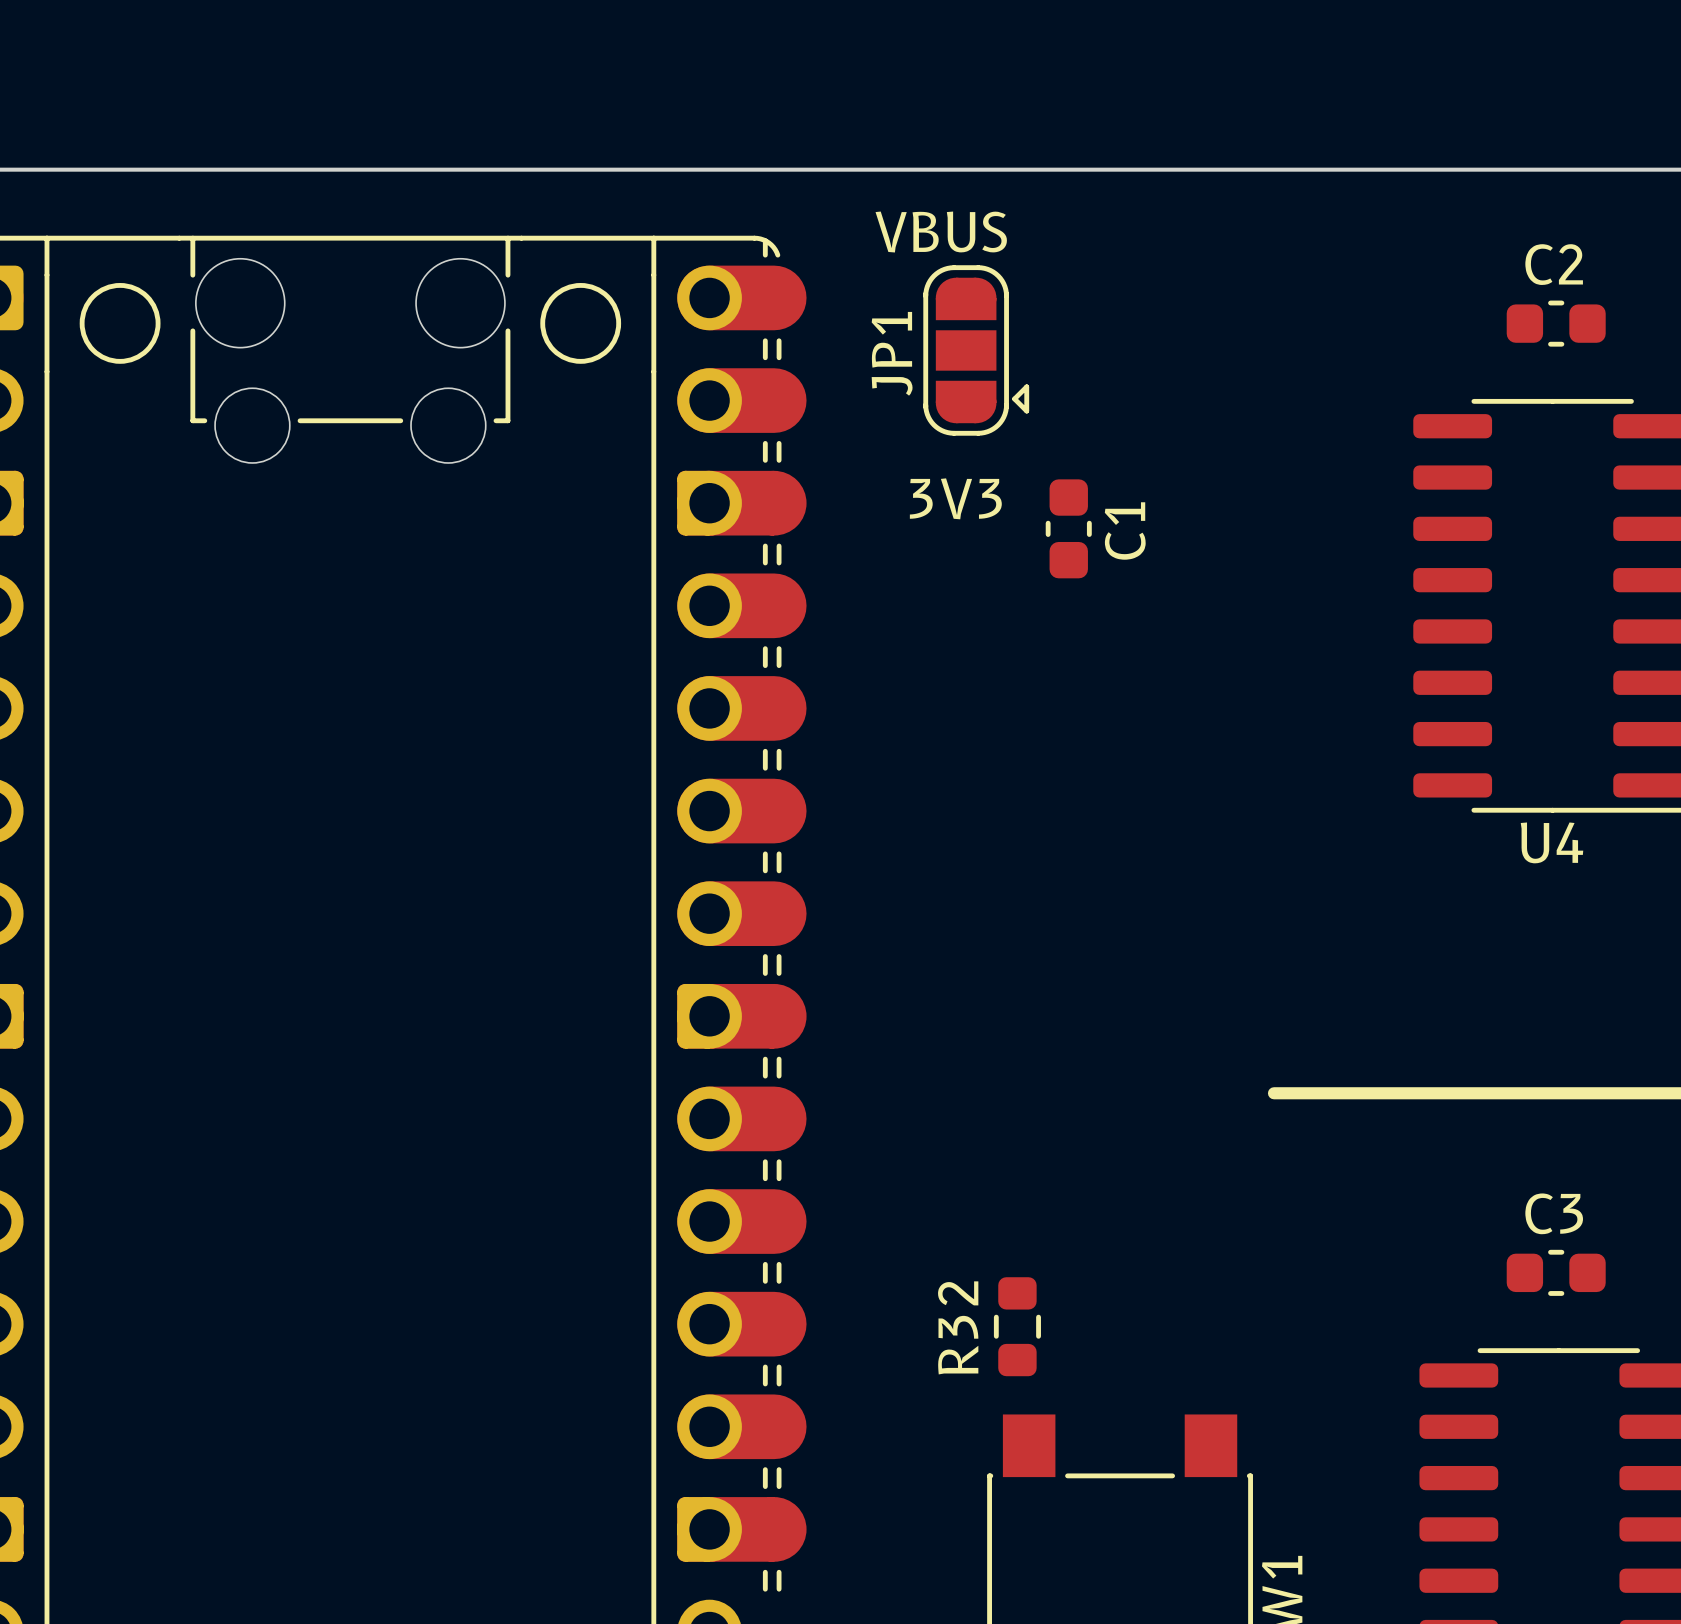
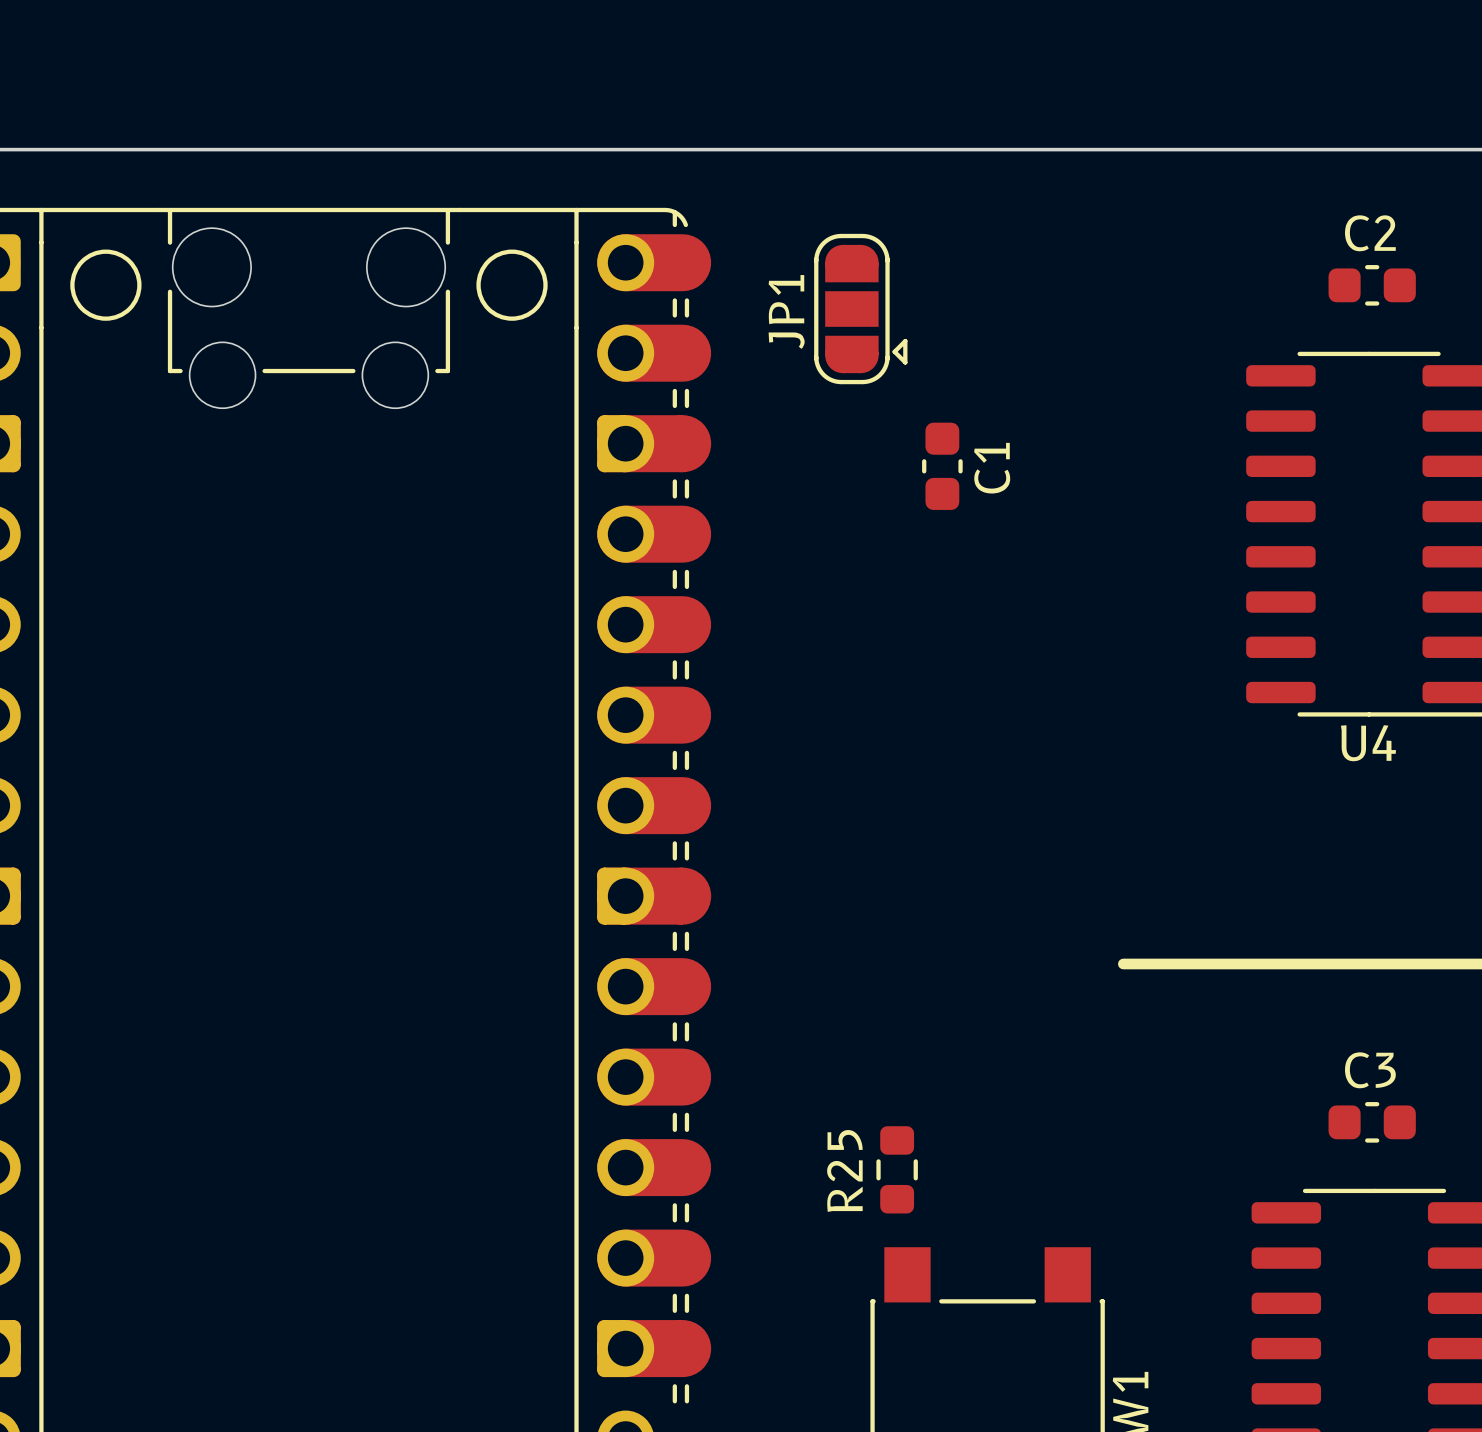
text: VBUS (941, 232) -> none
text: 3V3 (955, 498) -> none
R32 name: R32 (958, 1327) -> R25 (844, 1170)

